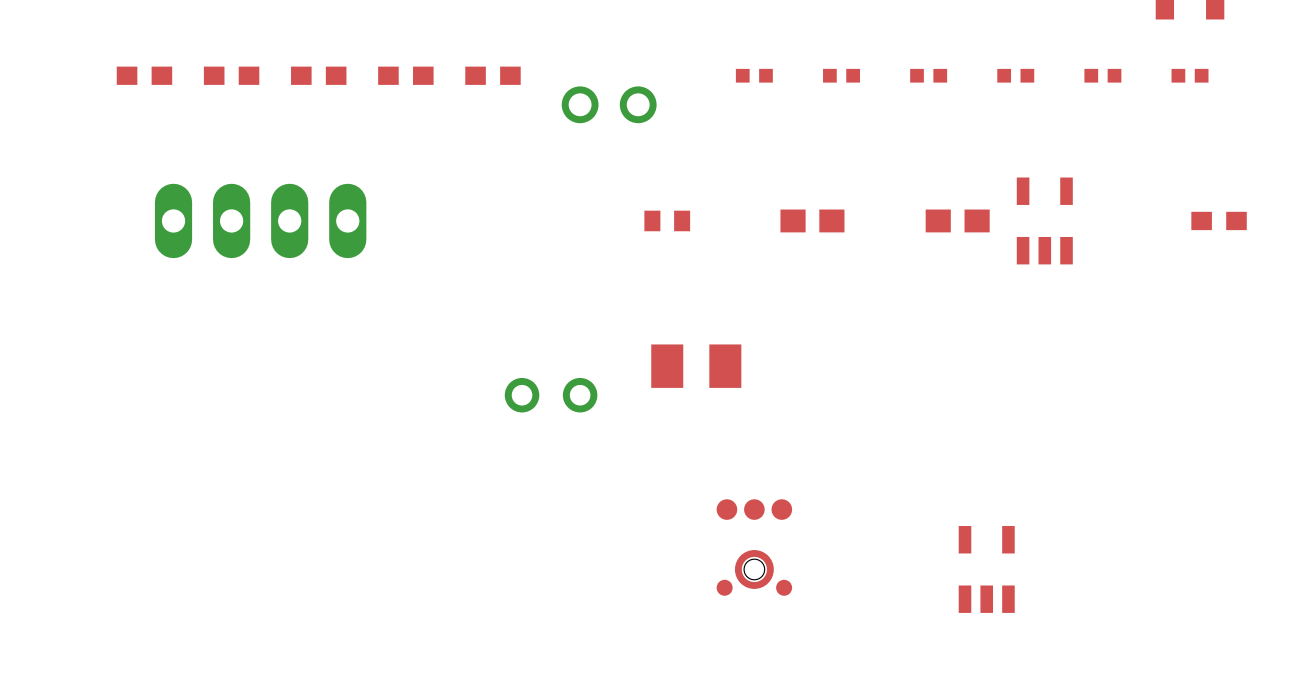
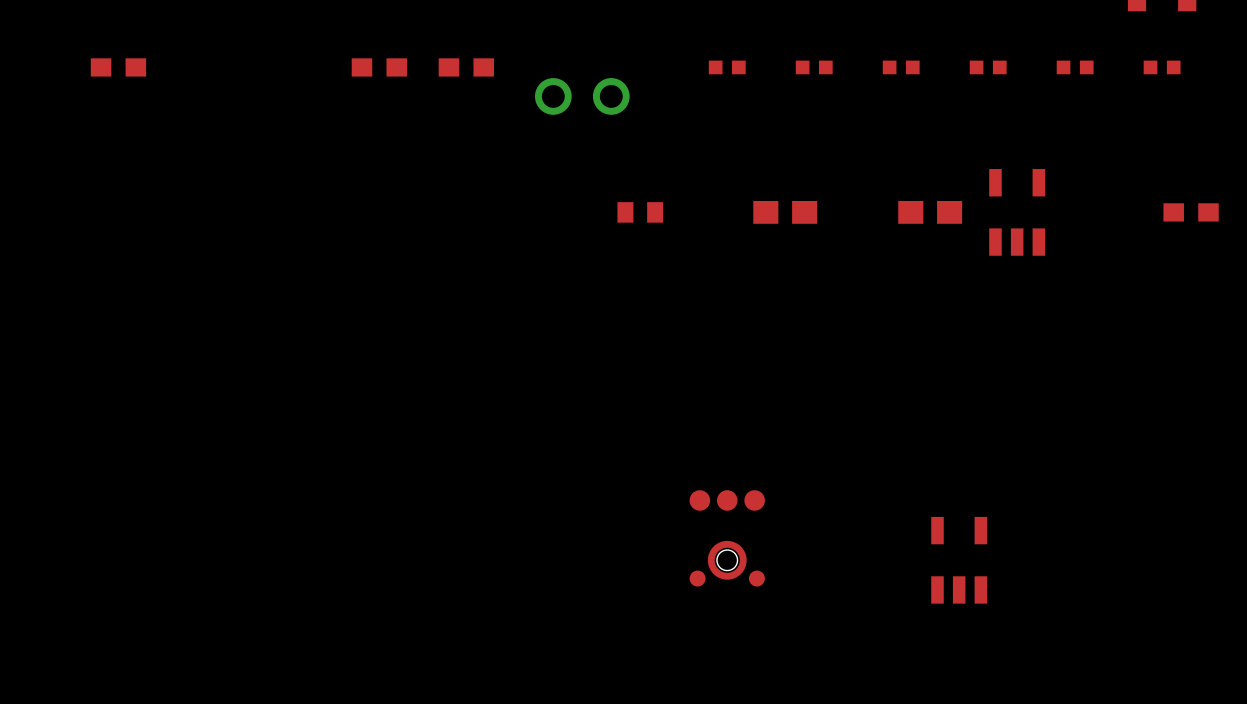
part: (231, 75) -> none
part: (318, 75) -> none
part: (260, 220) -> none
part: (696, 366) -> none
part: (551, 395) -> none

